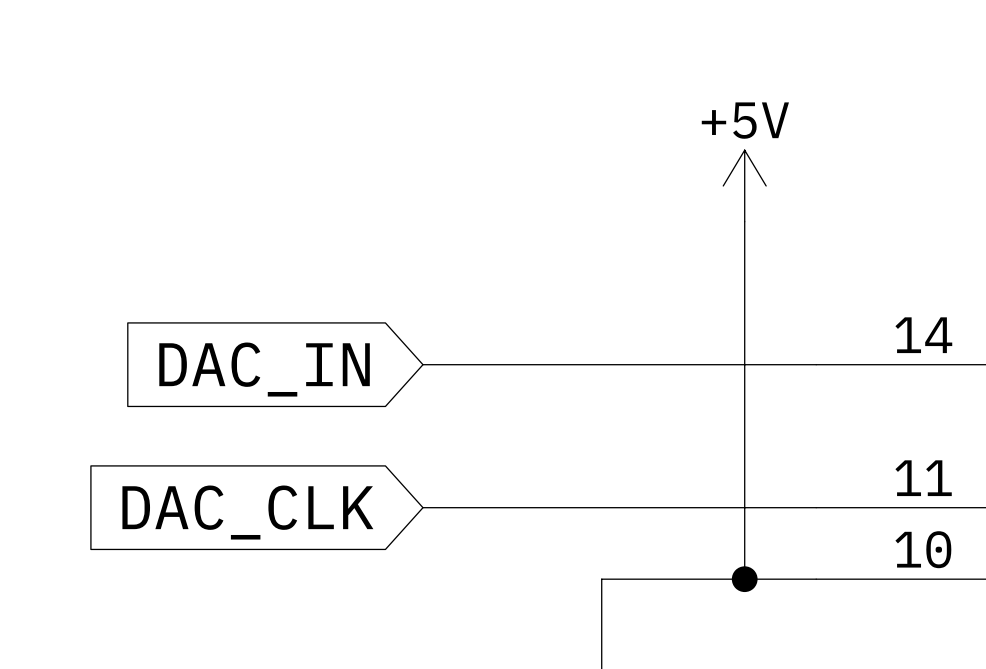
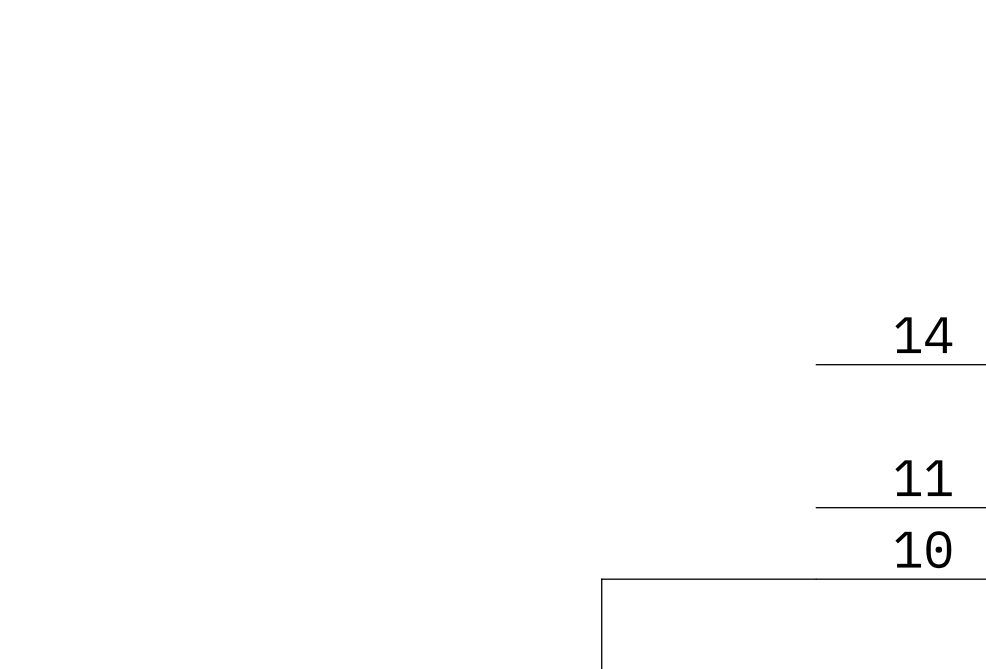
power symbol: +5V (744, 185) -> none
wire: (744, 221) (744, 579) -> none
wire: (422, 364) (816, 364) -> none
global label: DAC_IN (264, 369) -> none
wire: (422, 507) (816, 507) -> none
global label: DAC_CLK (247, 512) -> none
junction: (744, 579) -> none

